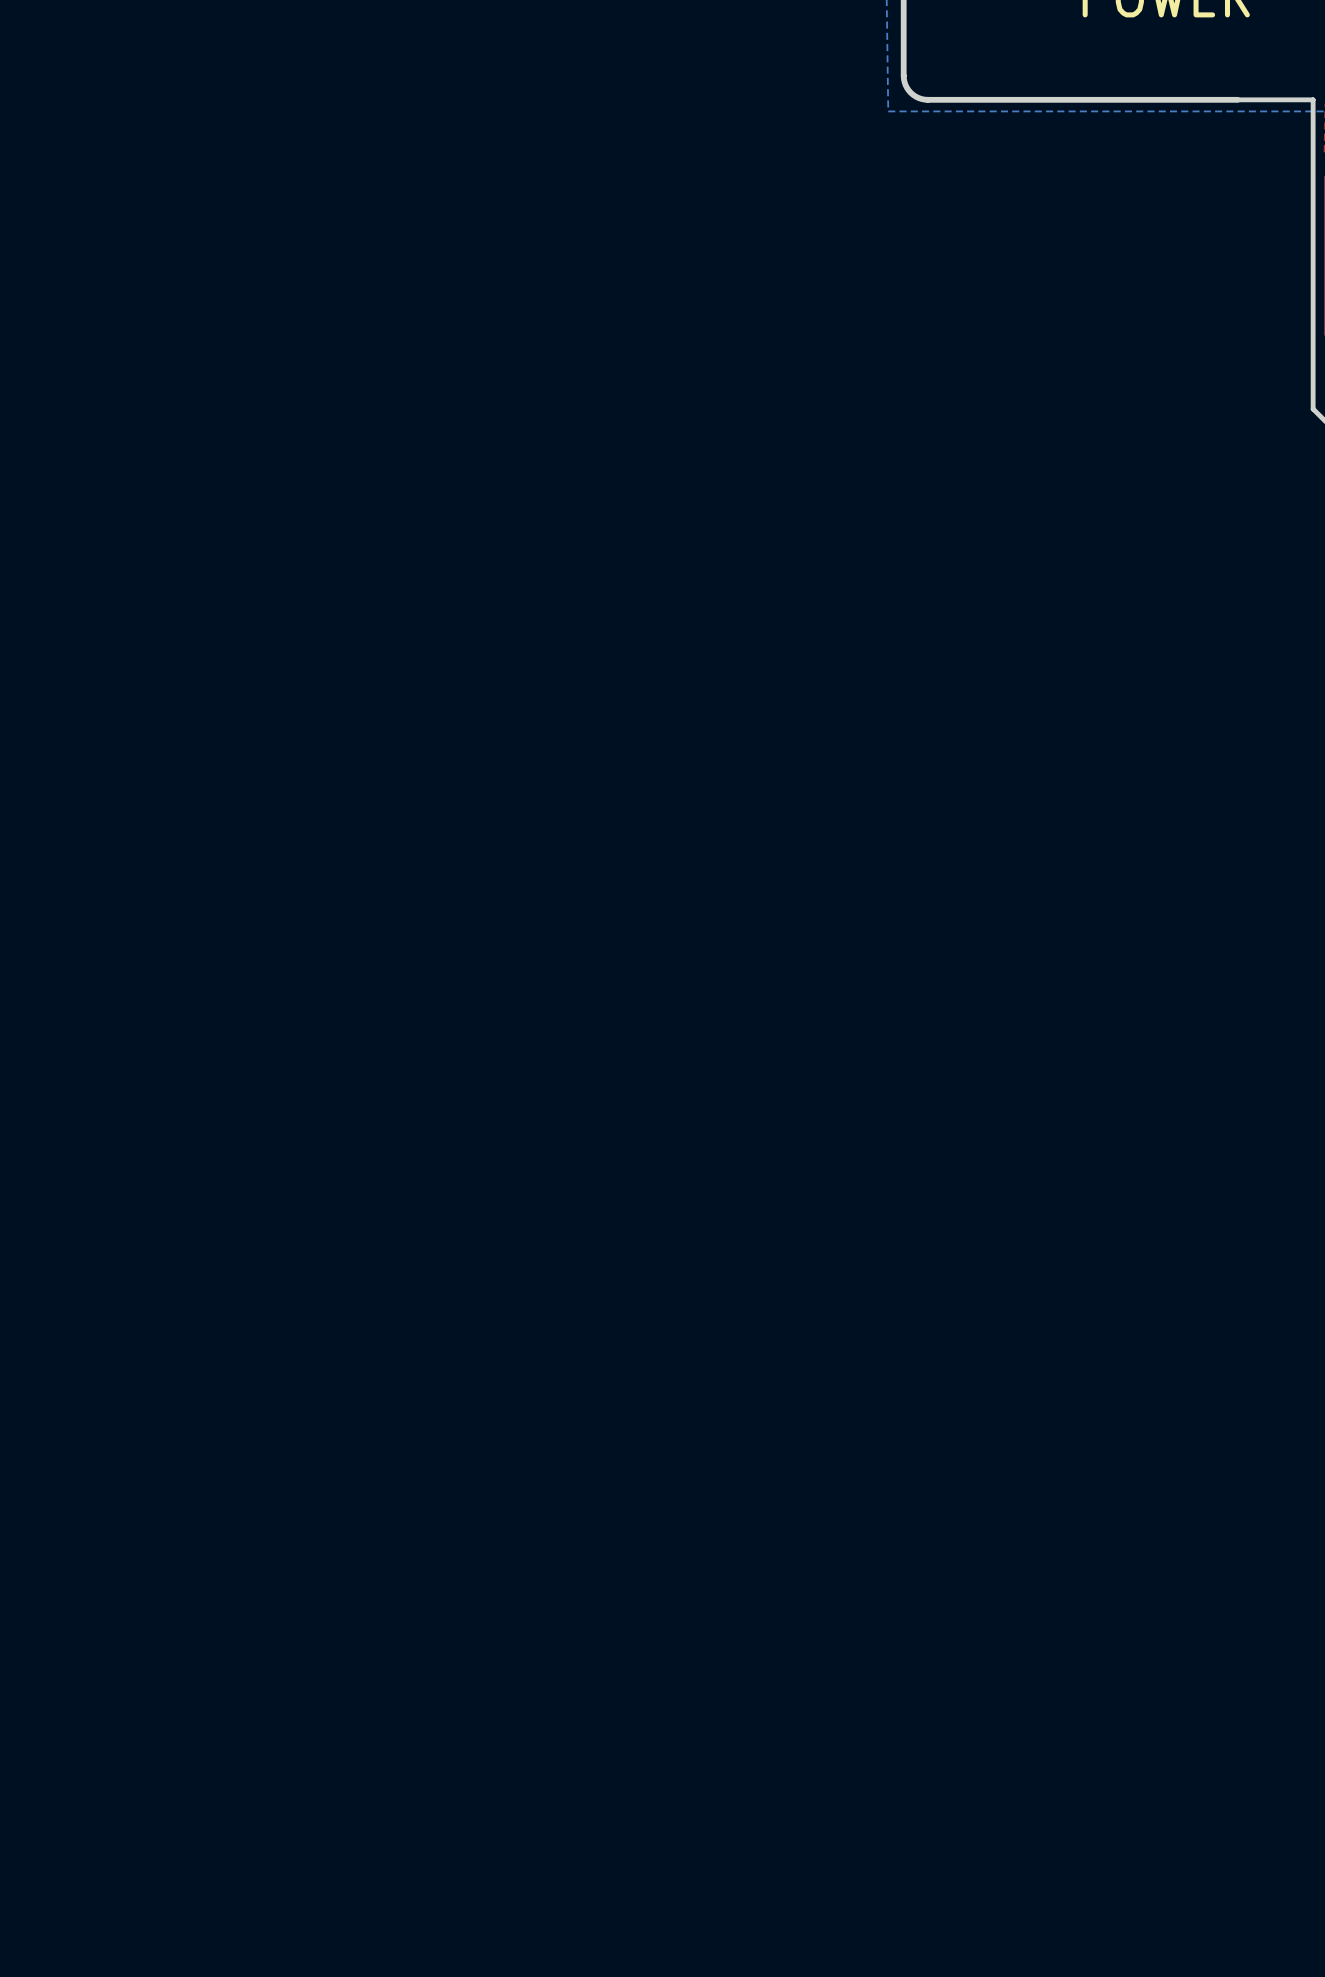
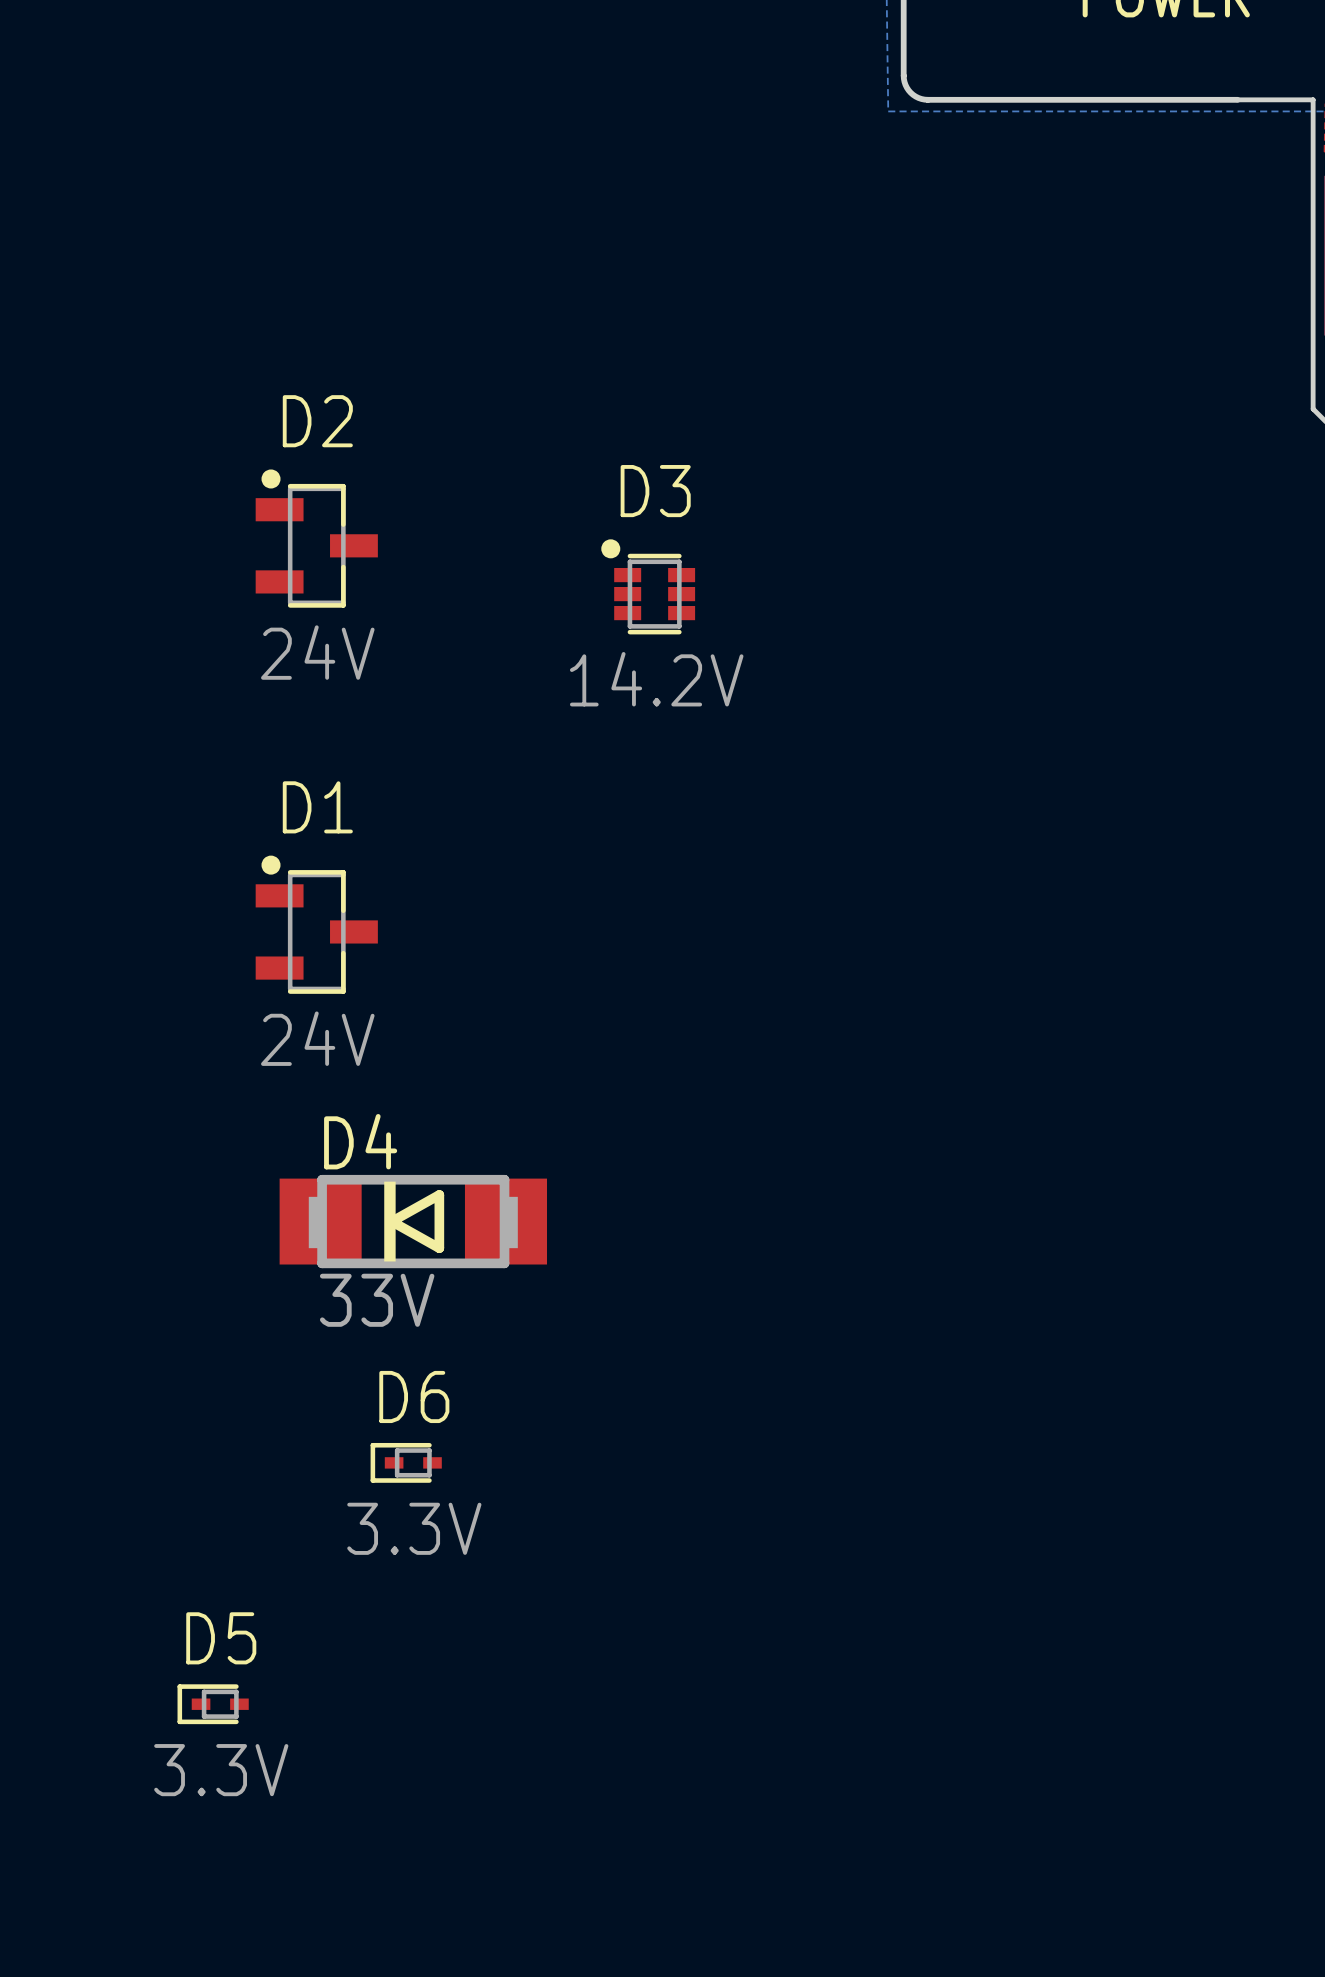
D2: none -> 24V (316, 538)
D3: none -> 14.2V (648, 586)
D1: none -> 24V (316, 924)
D4: none -> 33V (413, 1221)
D6: none -> 3.3V (406, 1462)
D5: none -> 3.3V (213, 1704)

